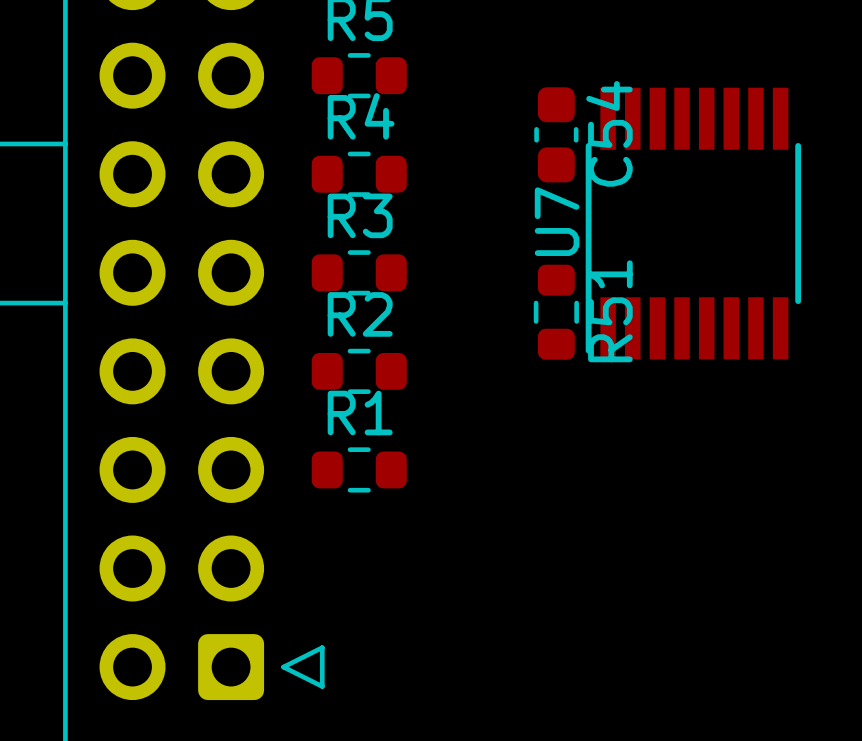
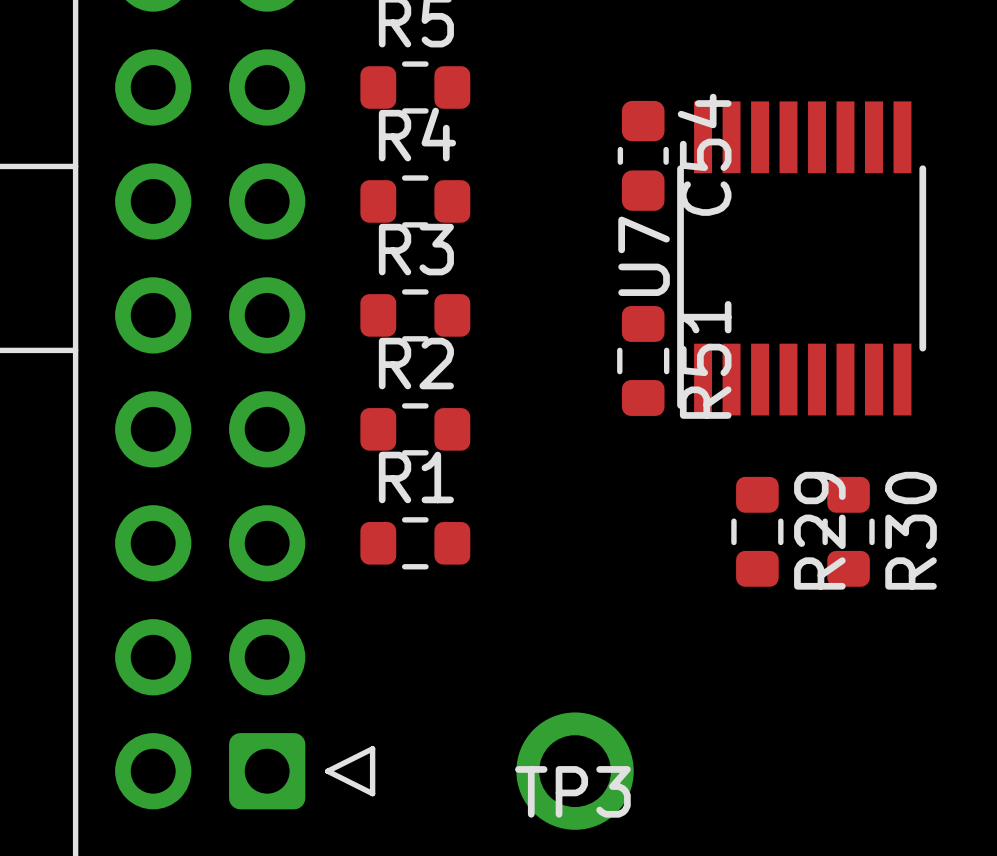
R29: none -> (757, 531)
R30: none -> (848, 531)
TP3: none -> (575, 771)

